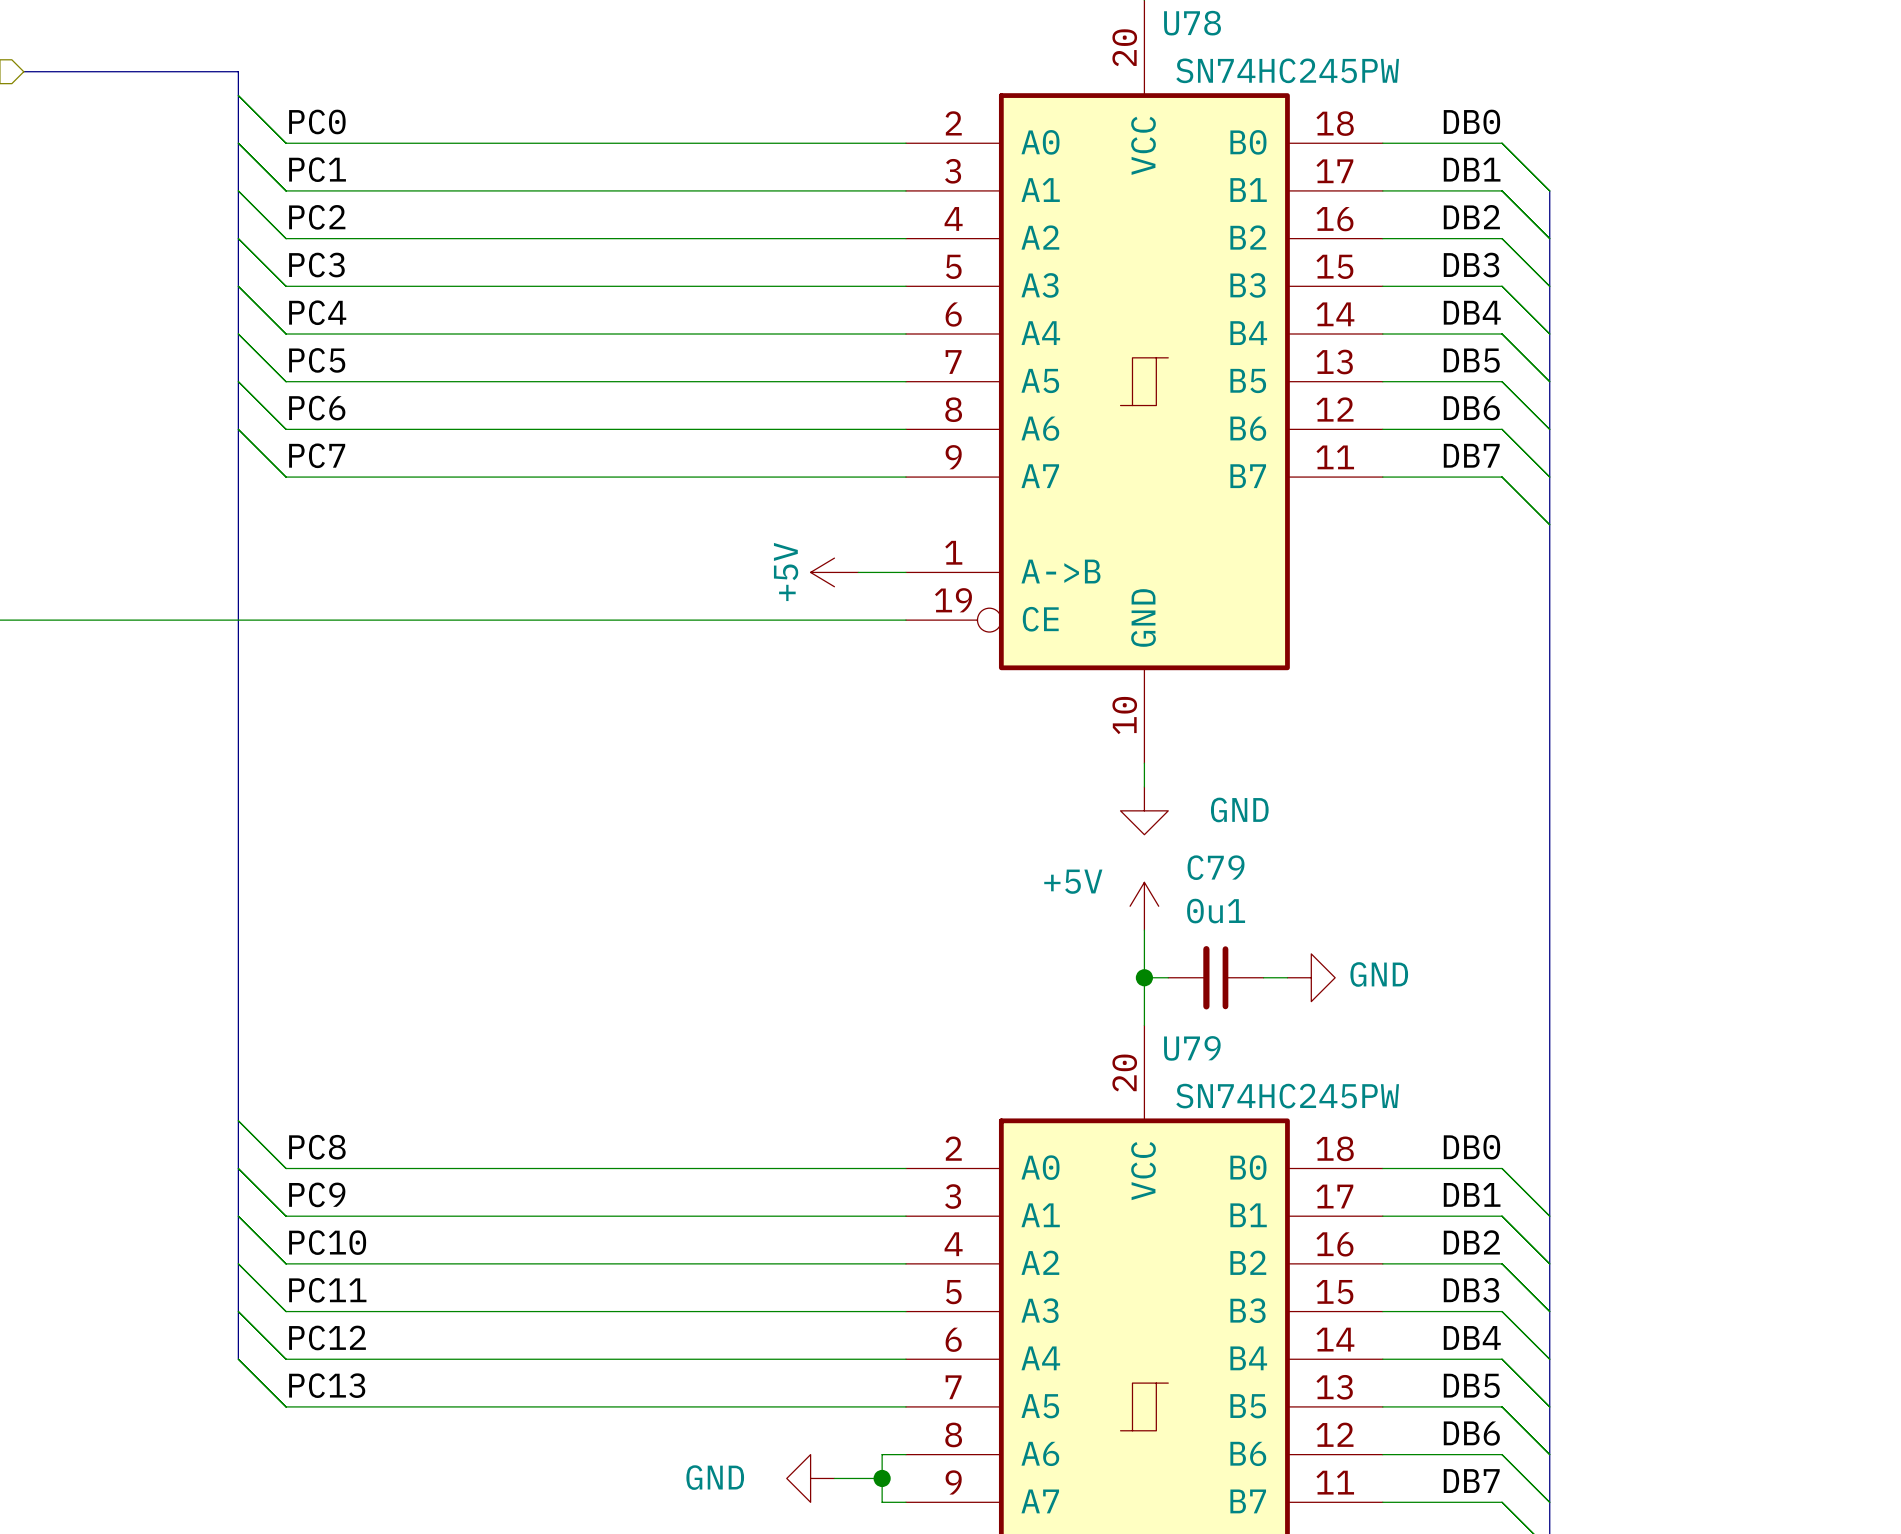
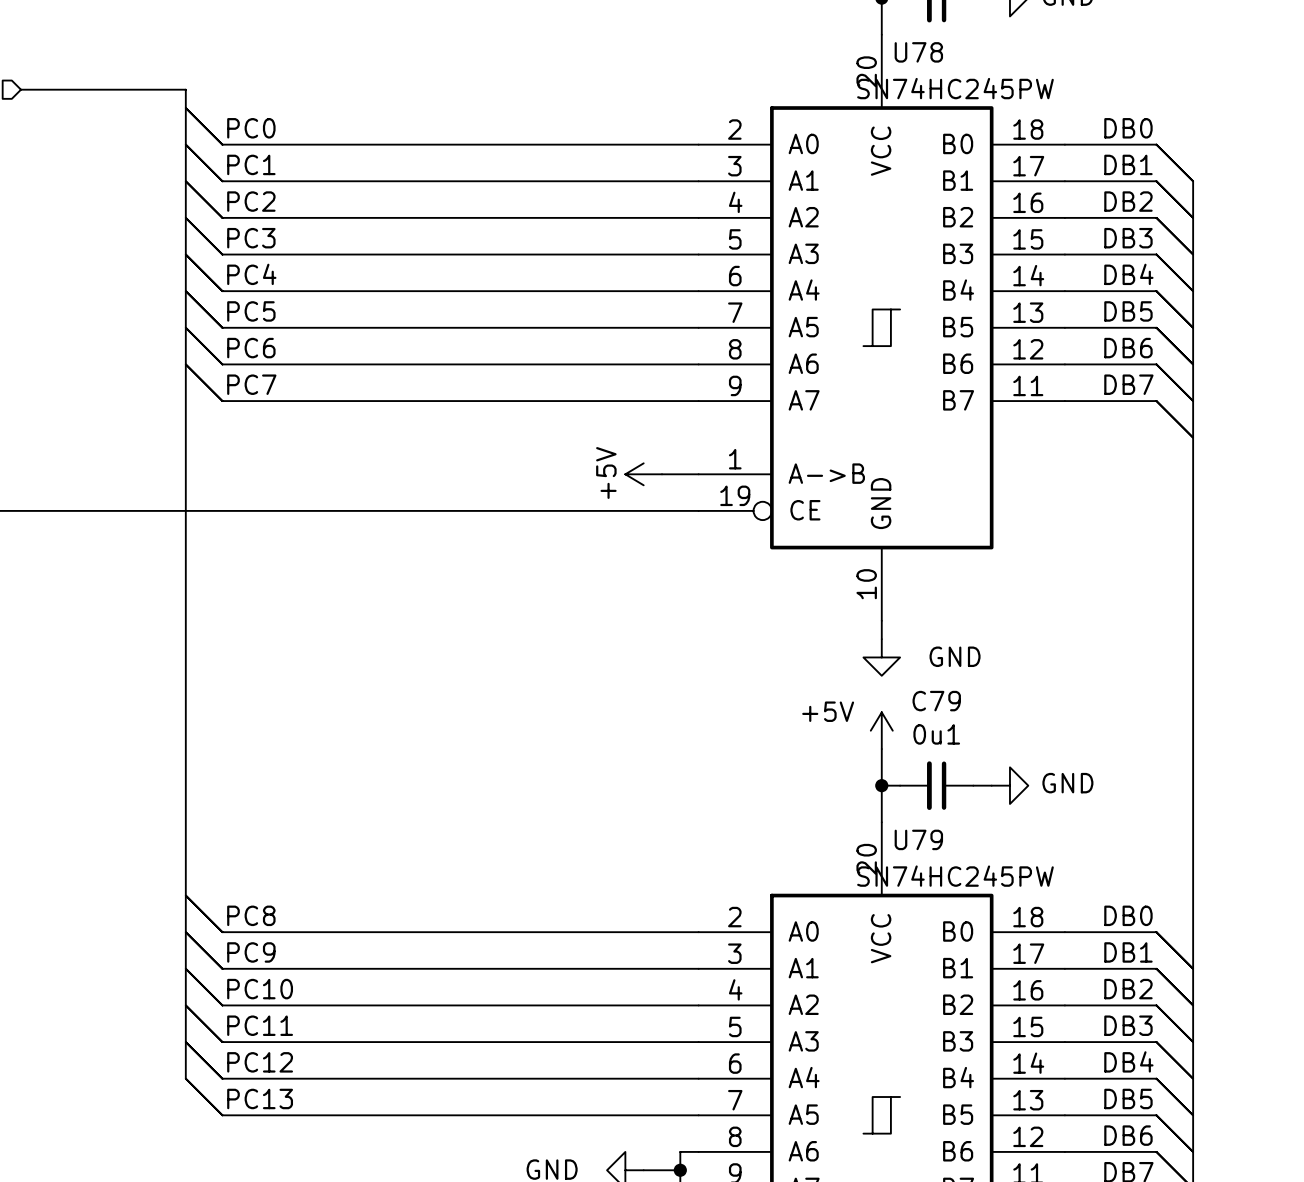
U78 value position: SN74HC245PW (1287, 70) -> SN74HC245PW (955, 88)
U79 value position: SN74HC245PW (1287, 1096) -> SN74HC245PW (955, 876)

